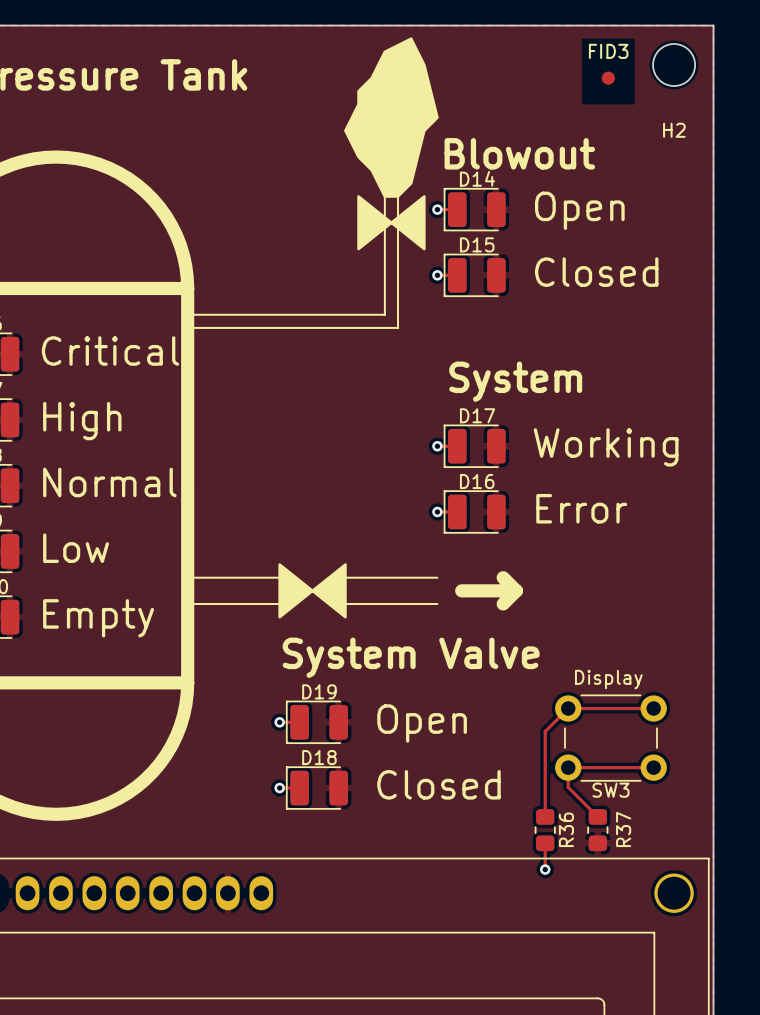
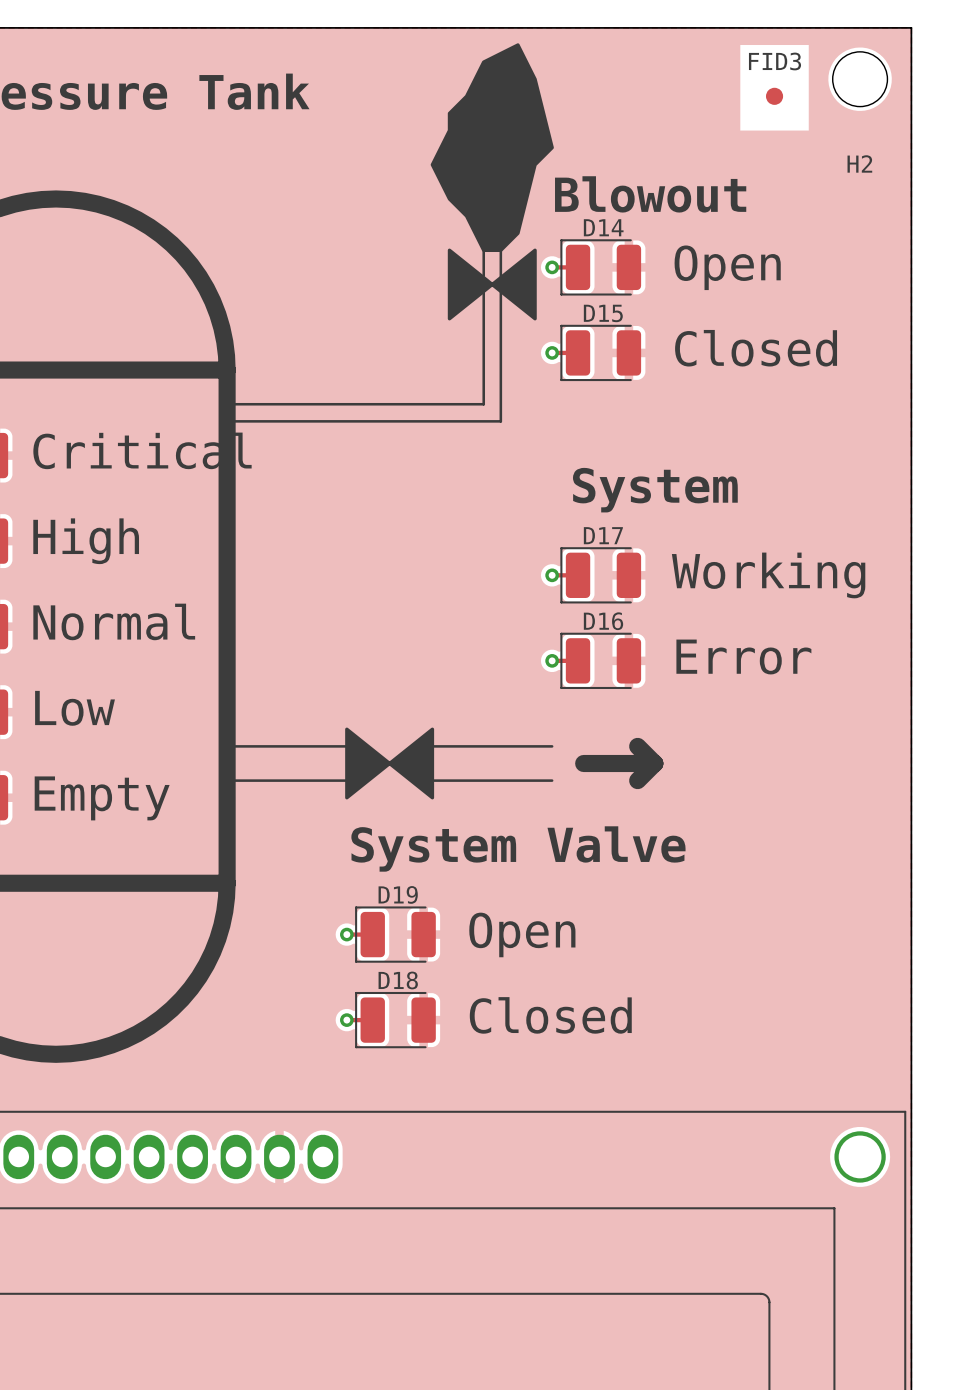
text: Display (608, 679) -> none
track: (653, 708) (568, 708) (545, 731) (545, 816) -> none
SW3: (610, 738) -> none
track: (653, 767) (568, 767) (568, 787) (597, 816) -> none
R36: (545, 830) -> none
R37: (597, 830) -> none
track: (545, 843) (545, 869) -> none
via: (545, 869) -> none

